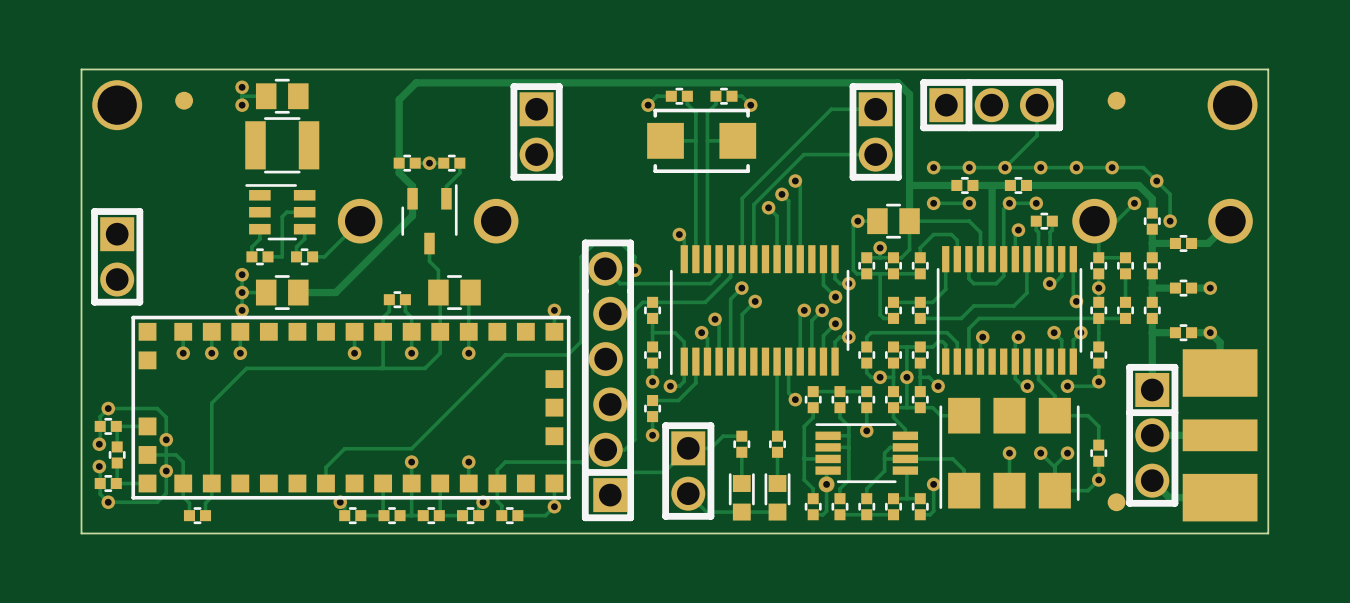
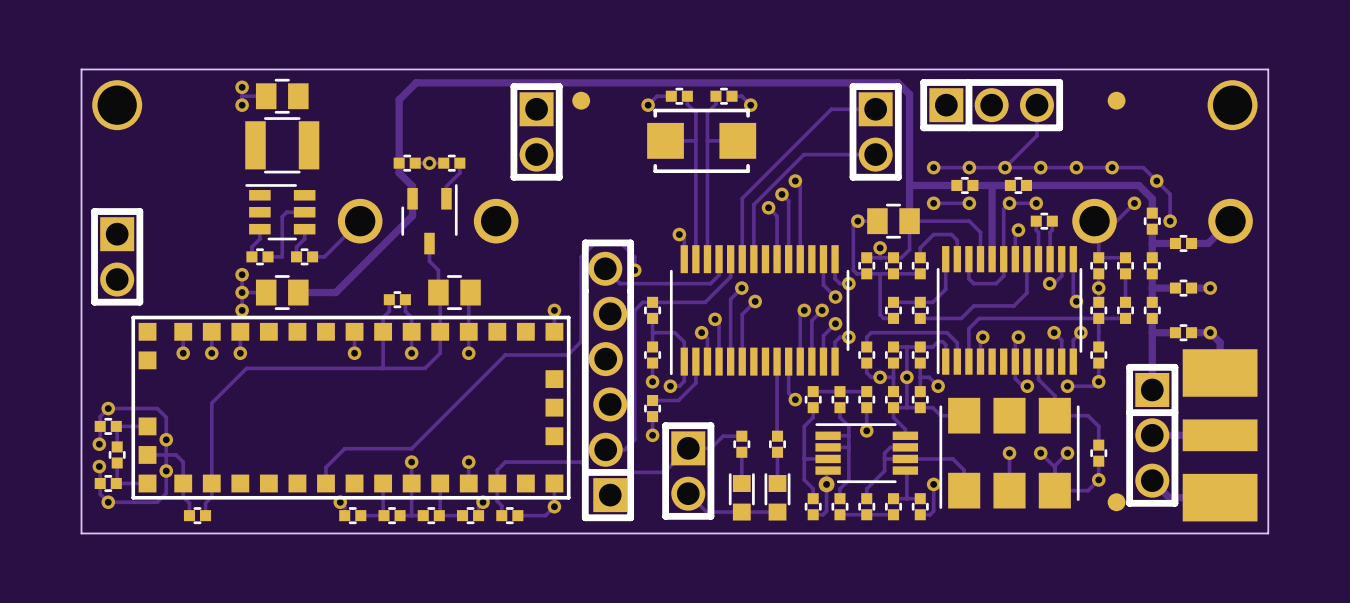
part position: (184, 100) -> (581, 100)

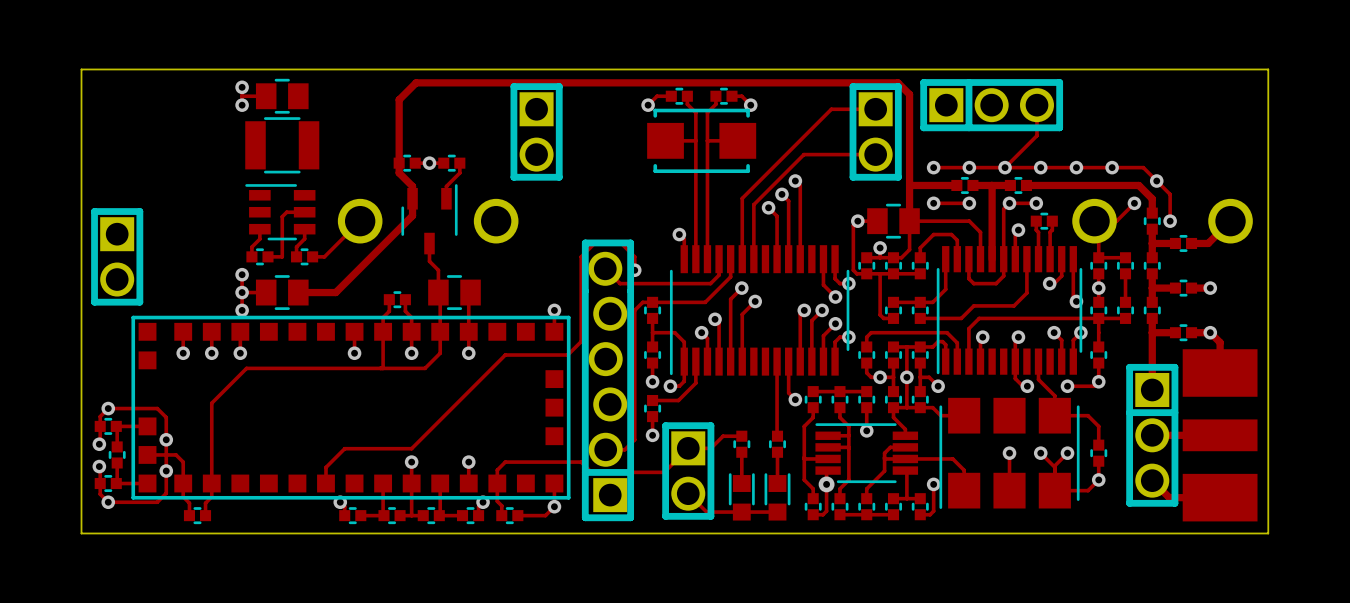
part: (581, 100) -> none
part: (1116, 100) -> none
part: (117, 105) -> none
part: (1232, 105) -> none
part: (1116, 502) -> none

